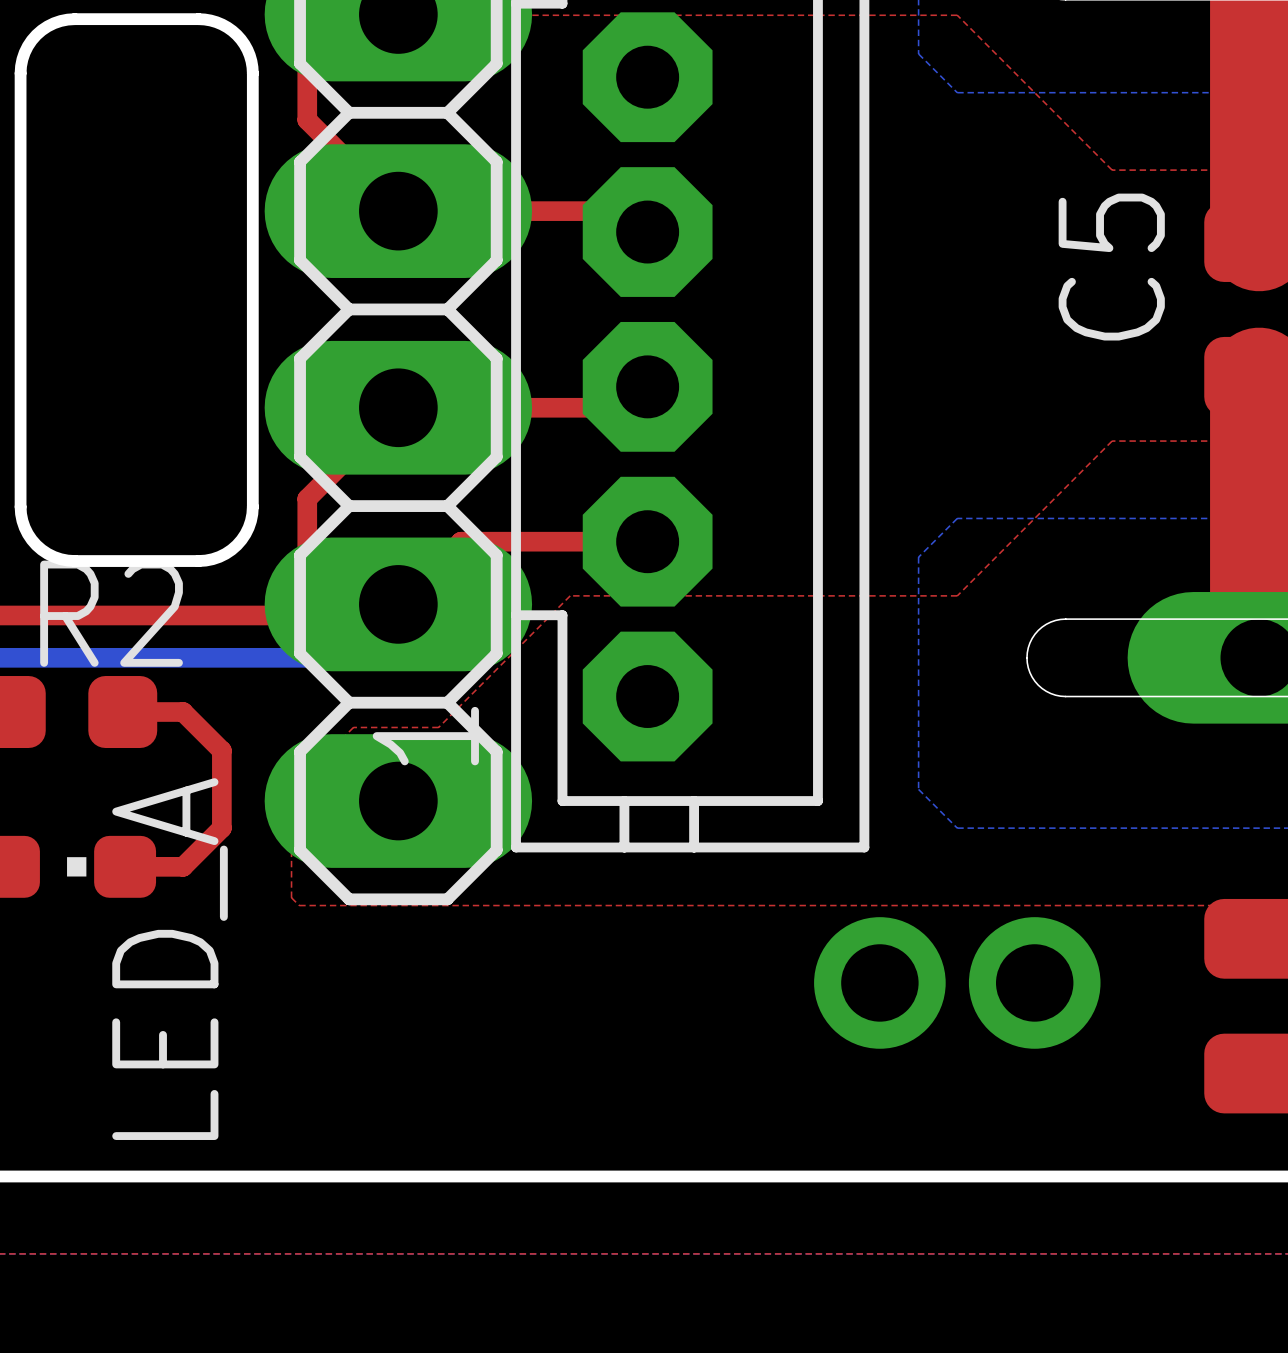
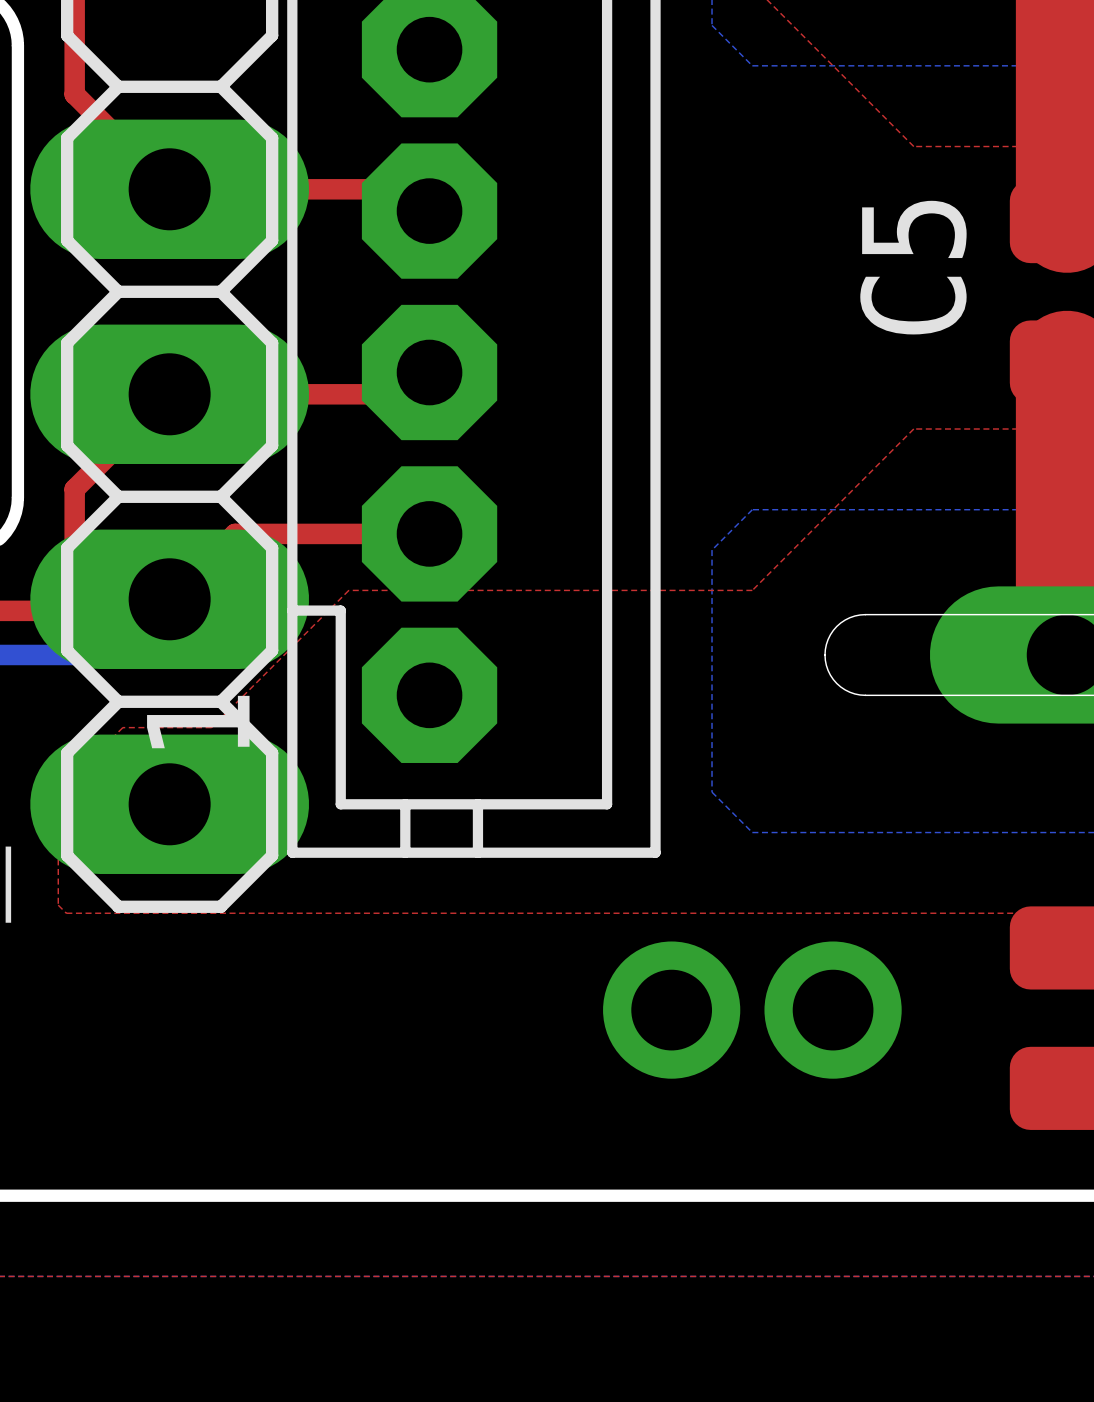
via position: (879, 982) -> (671, 1010)
via position: (1034, 982) -> (833, 1010)

